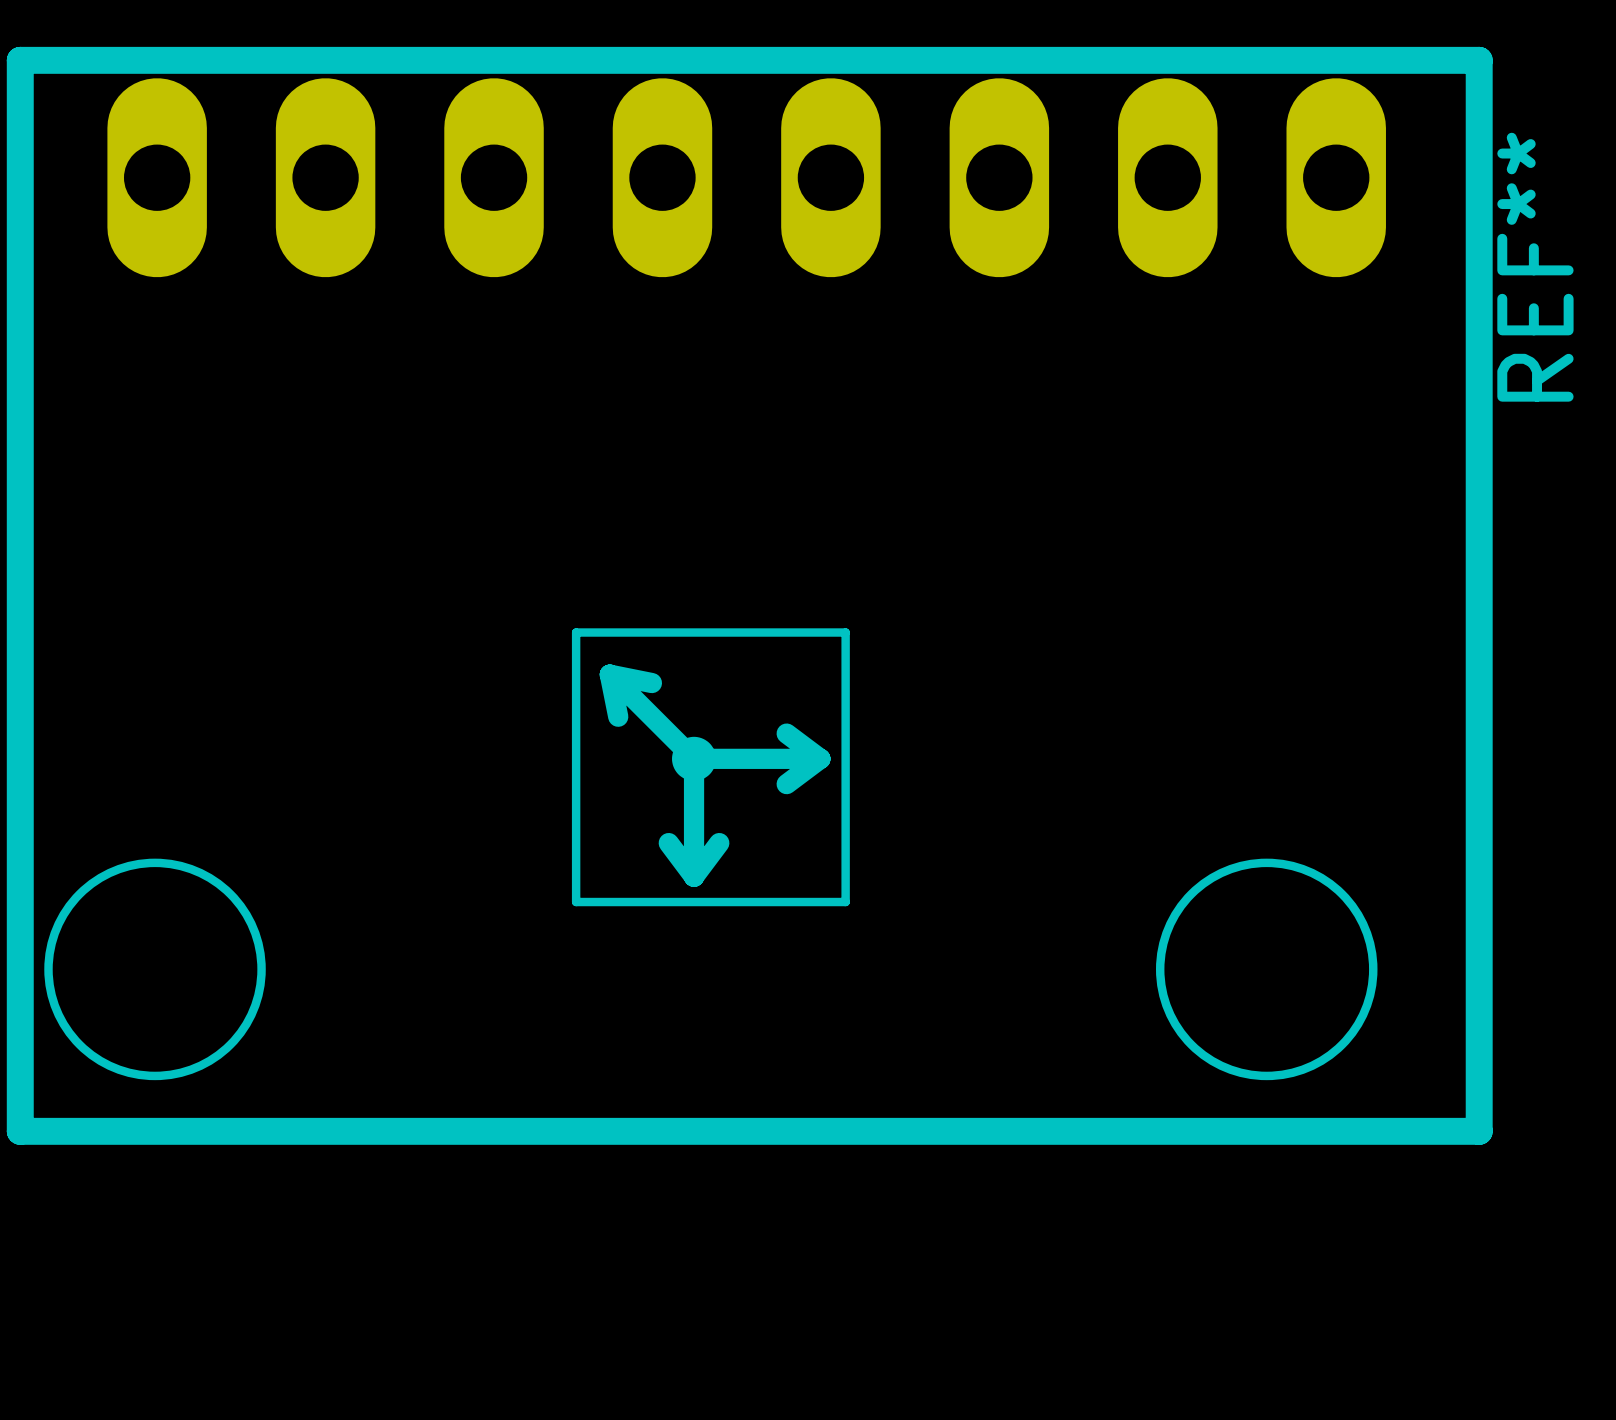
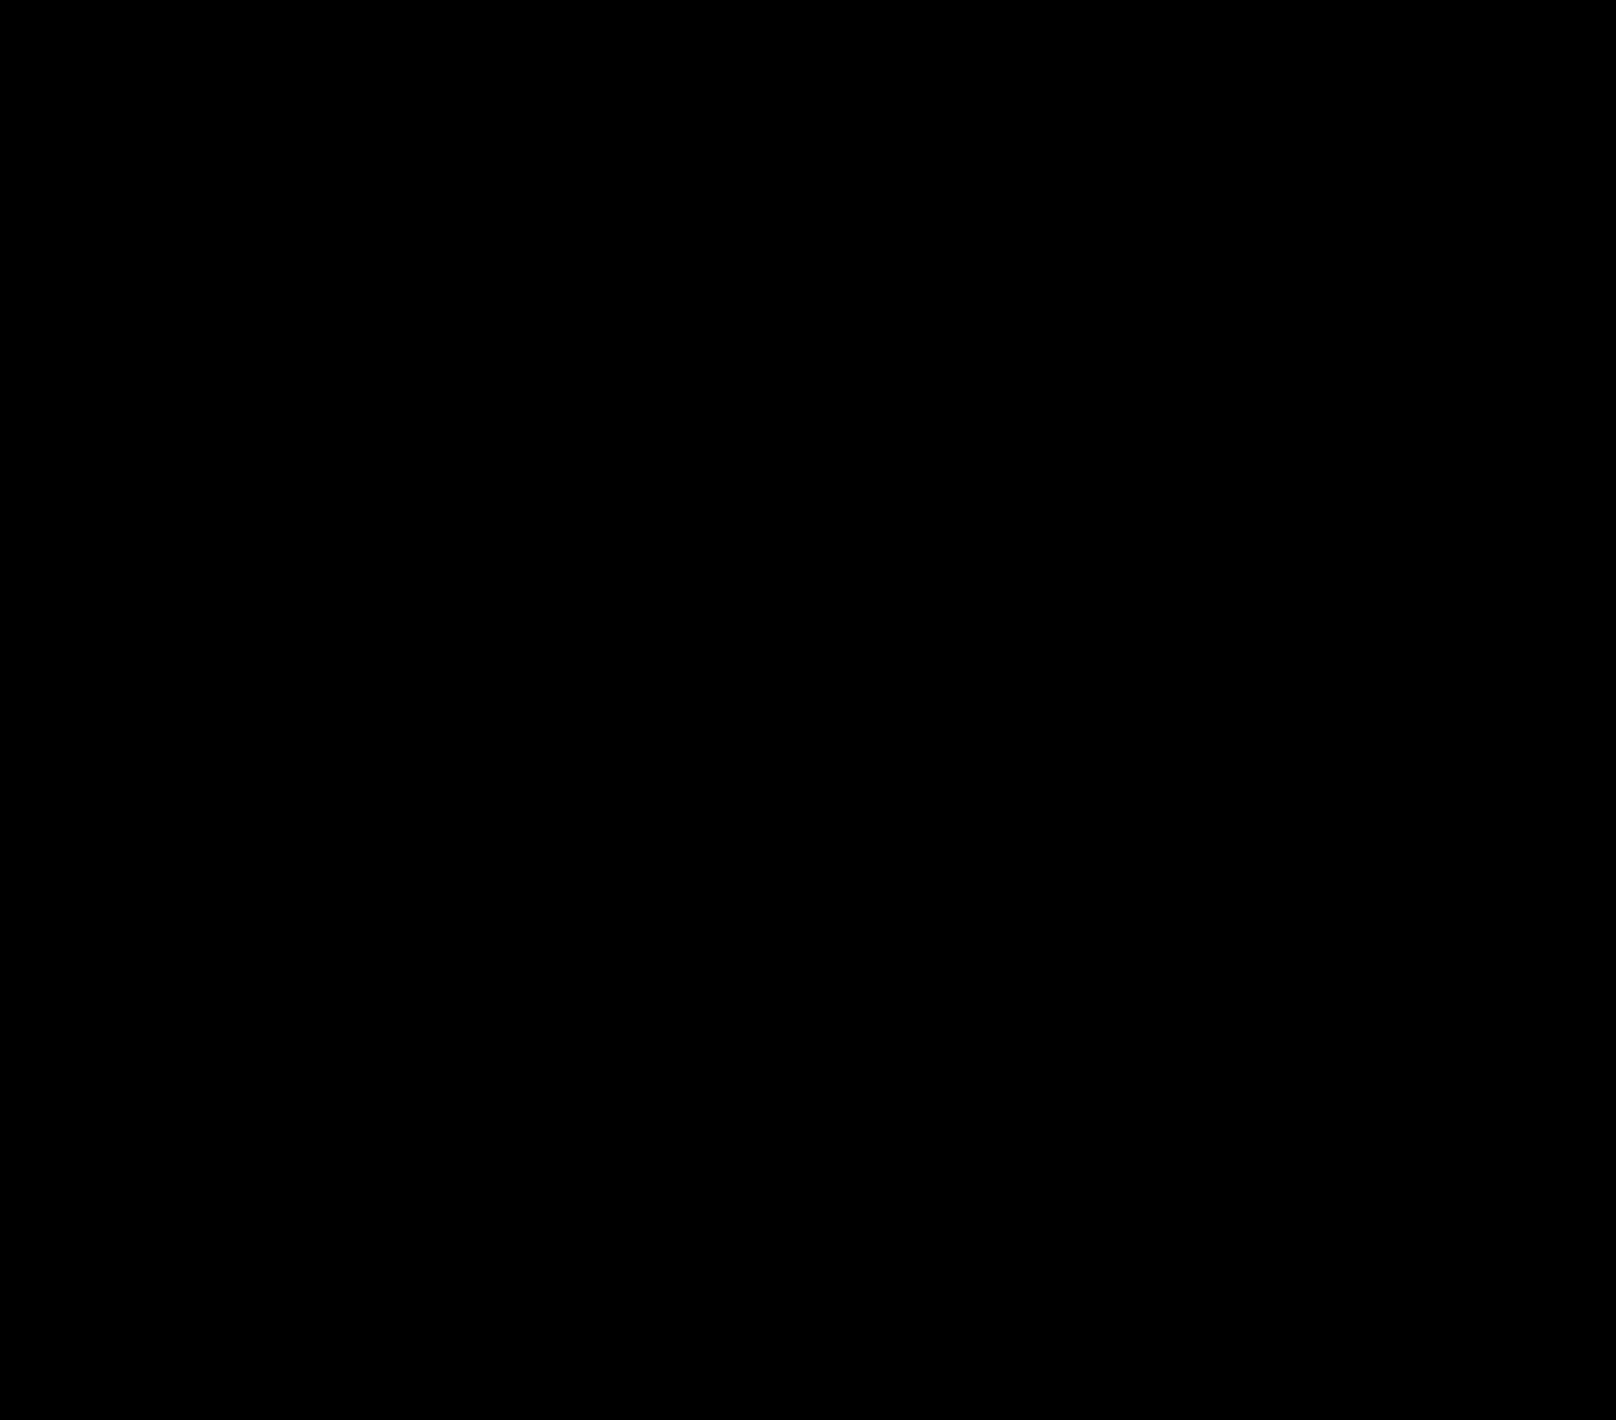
REF**: (749, 595) -> none

